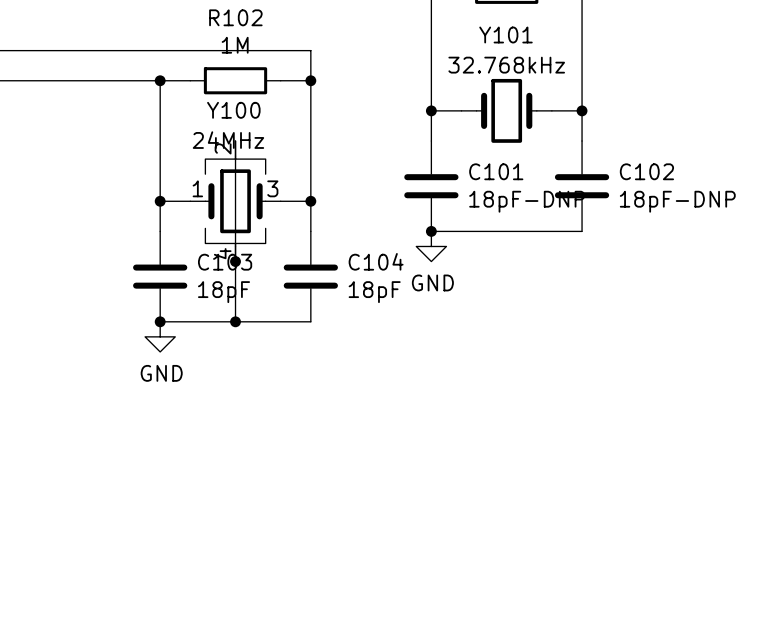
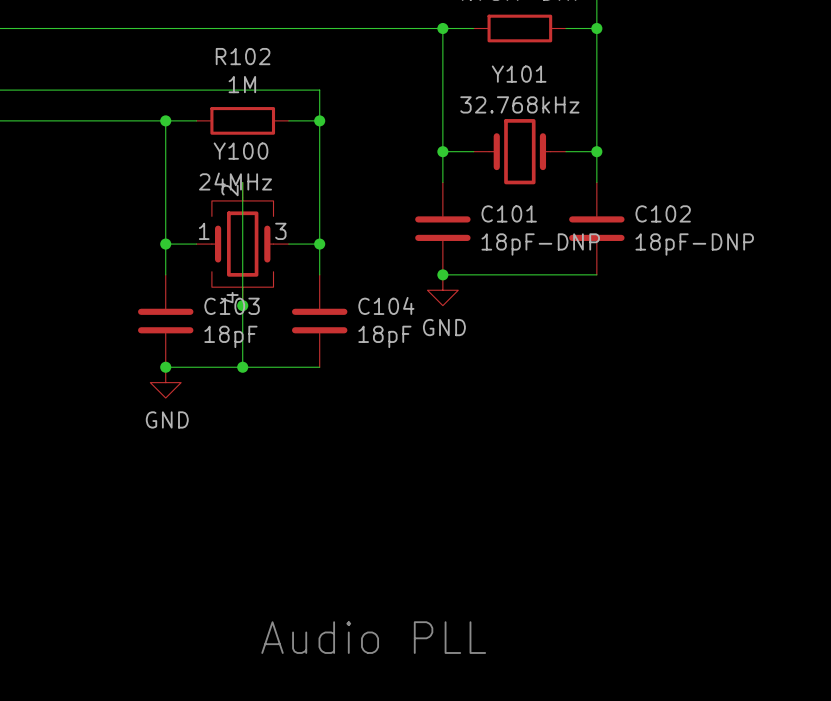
text: none -> Audio PLL (373, 637)

